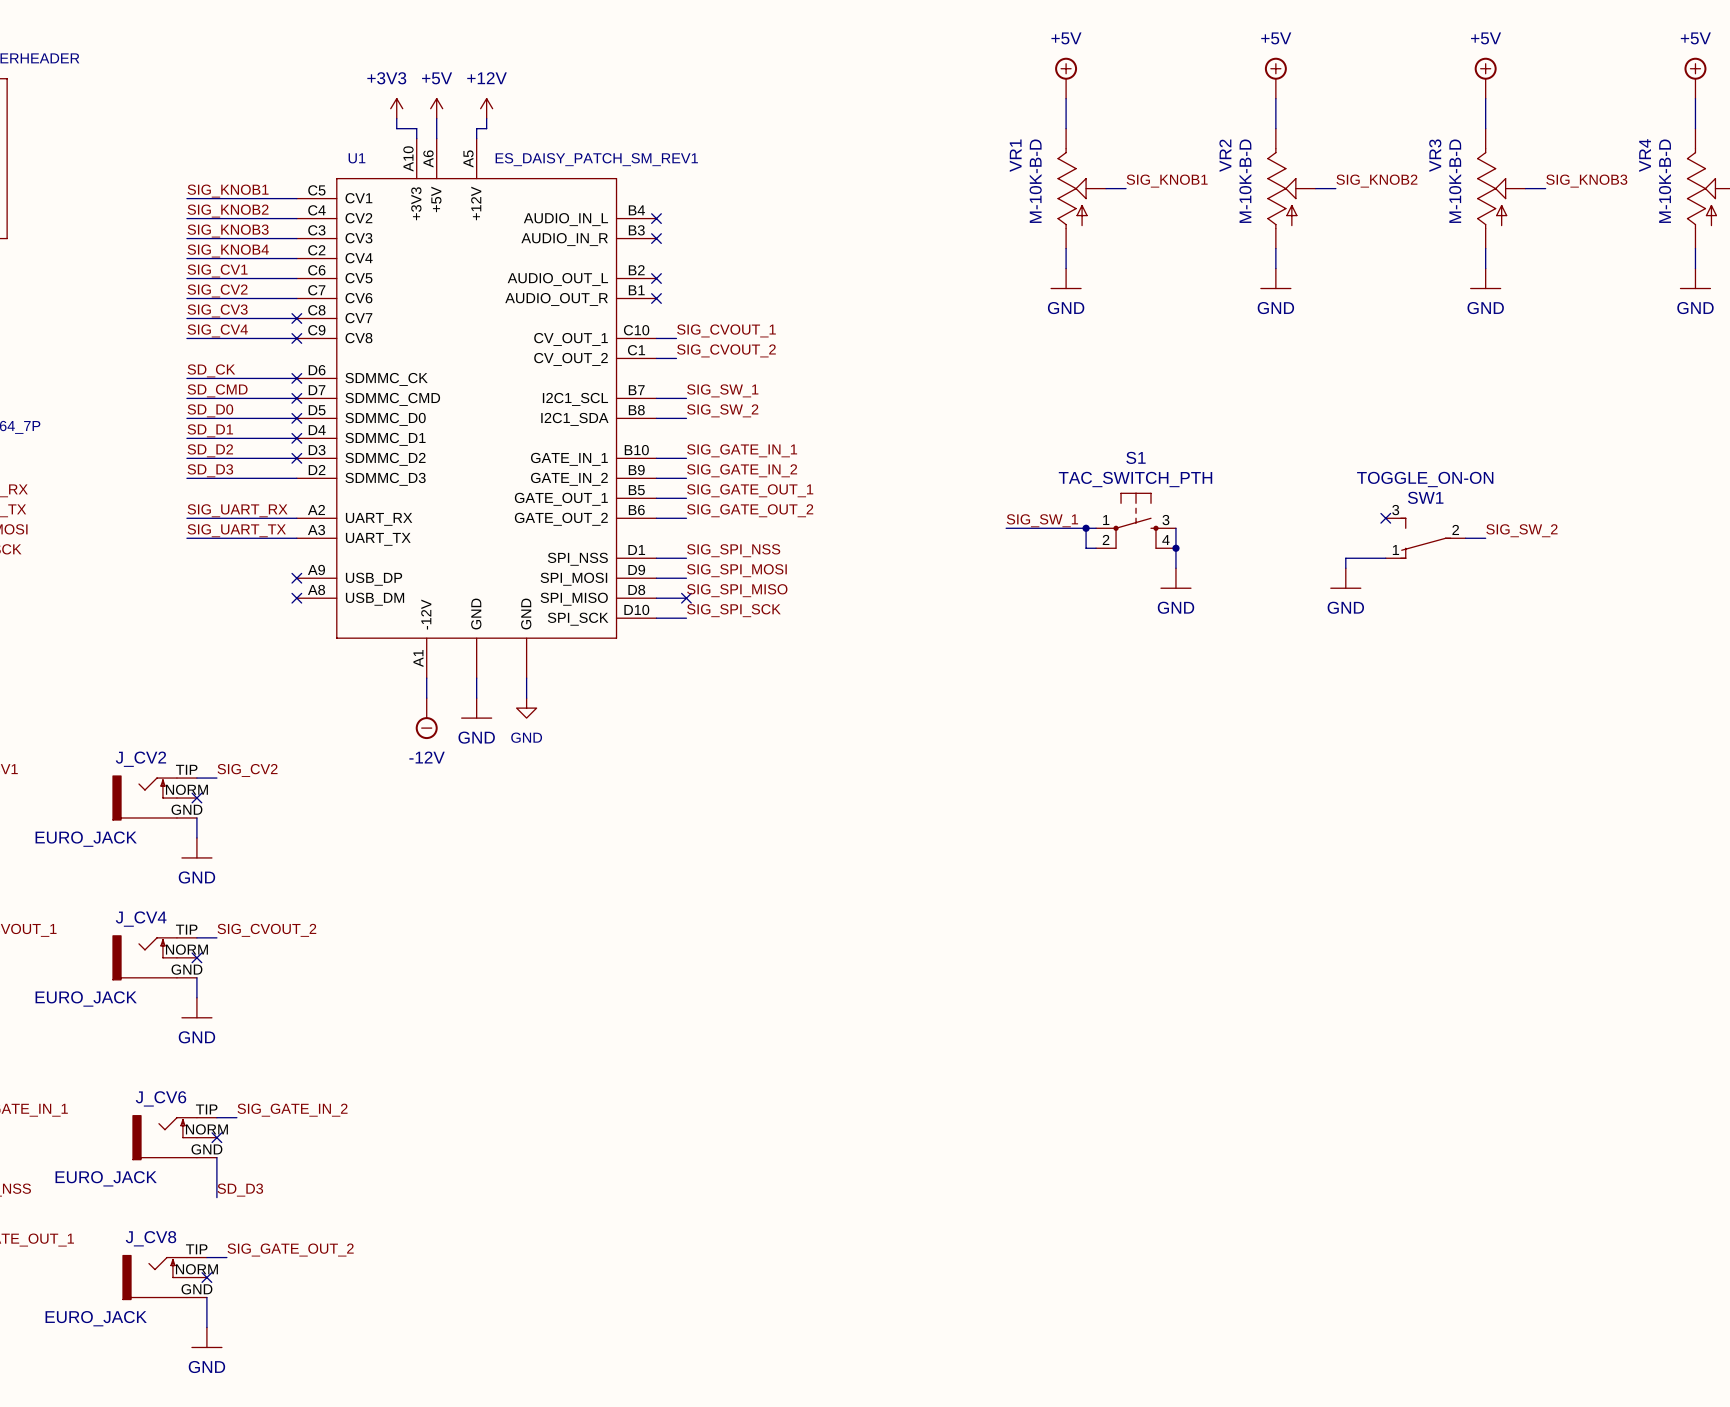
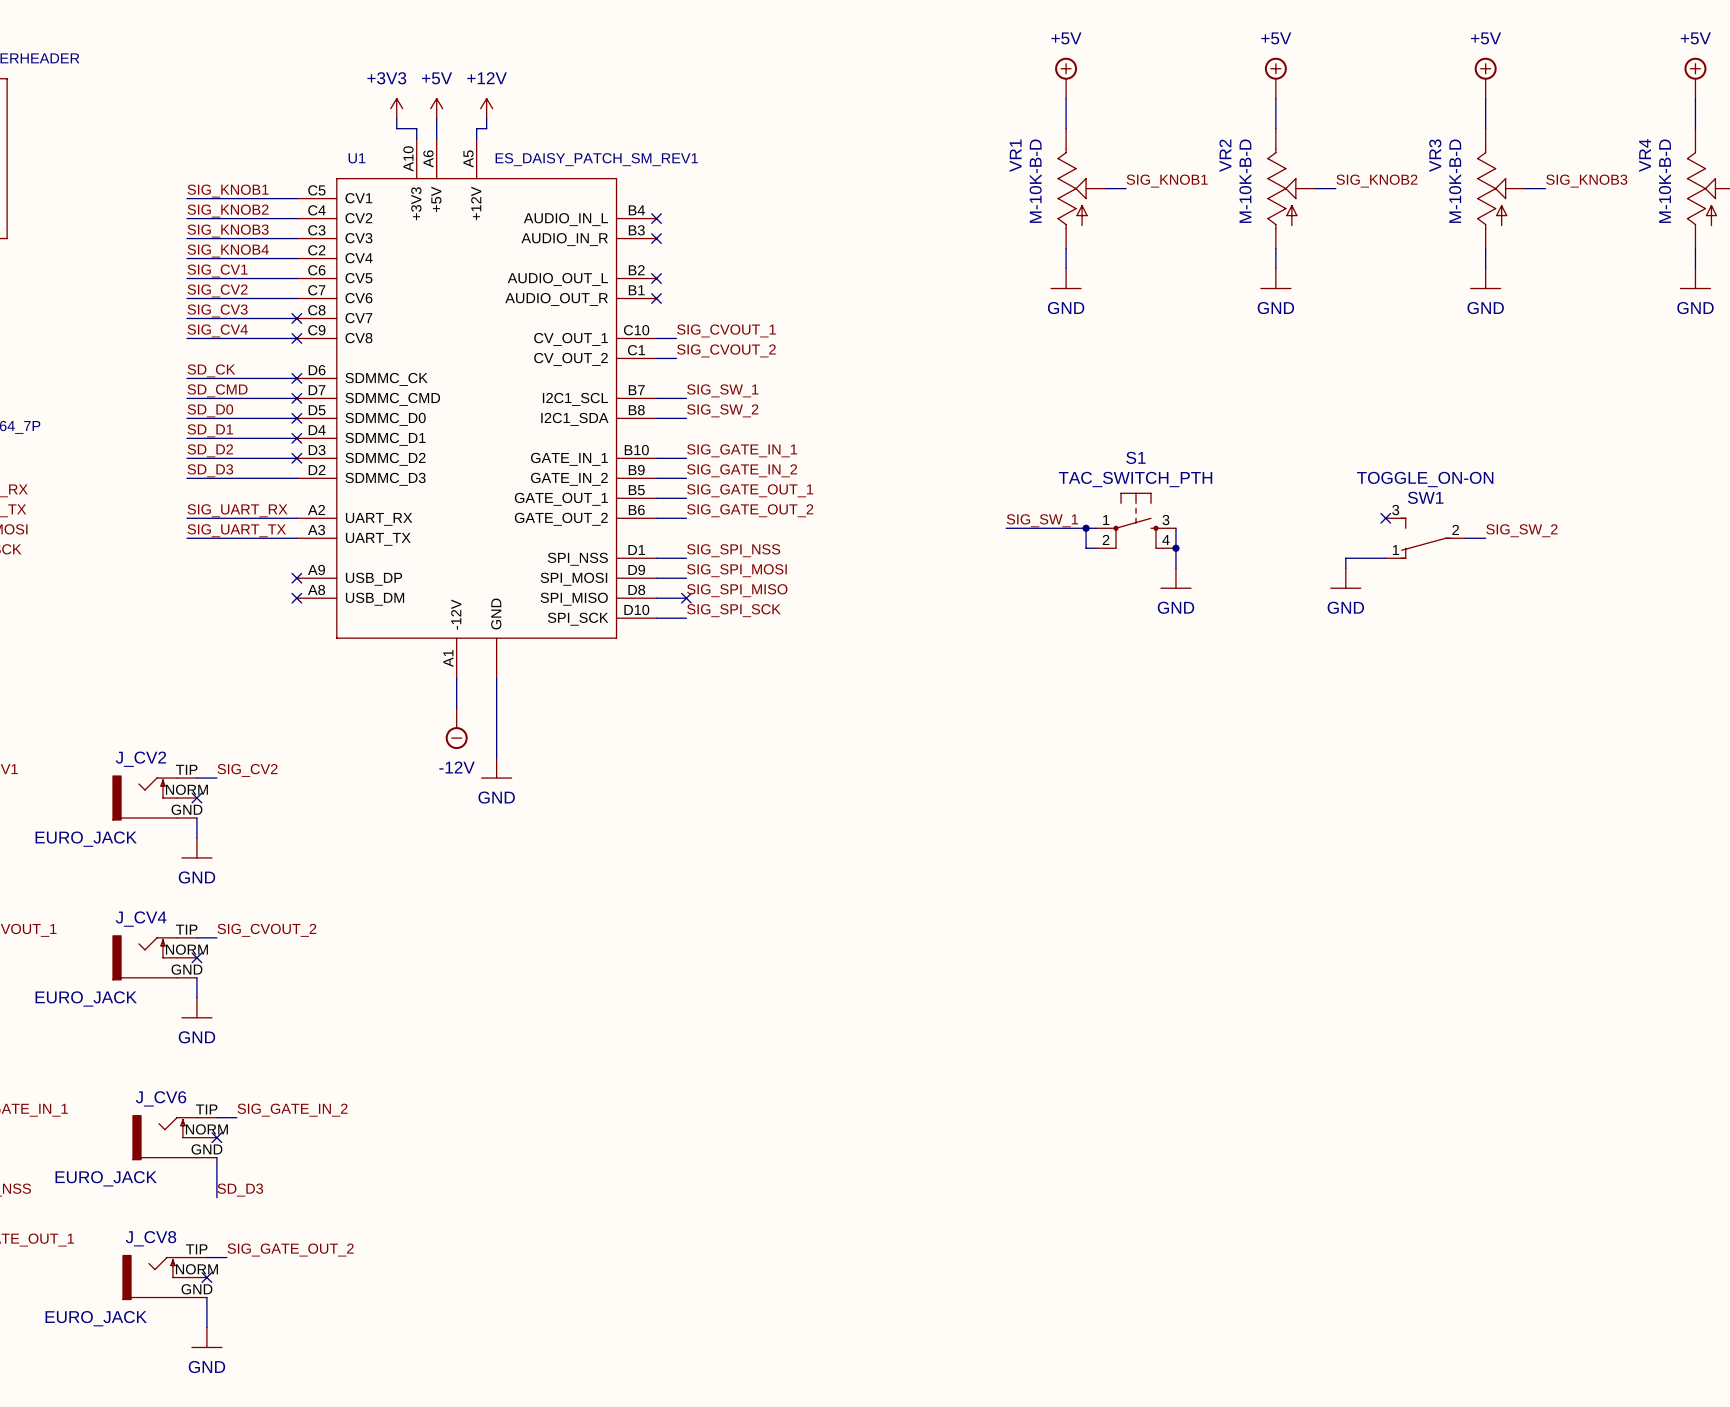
U1 symbol: [296, 138, 657, 679] -> [296, 138, 657, 679]
wire: (426, 678) (426, 698) -> none
wire: none -> (456, 678) (456, 708)
wire: (476, 678) (476, 698) -> none
wire: none -> (496, 678) (496, 758)
wire: (526, 678) (526, 698) -> none
power symbol position: GND (476, 708) -> GND (496, 768)
power symbol: GND (526, 708) -> none
power symbol position: -12V (426, 718) -> -12V (456, 728)

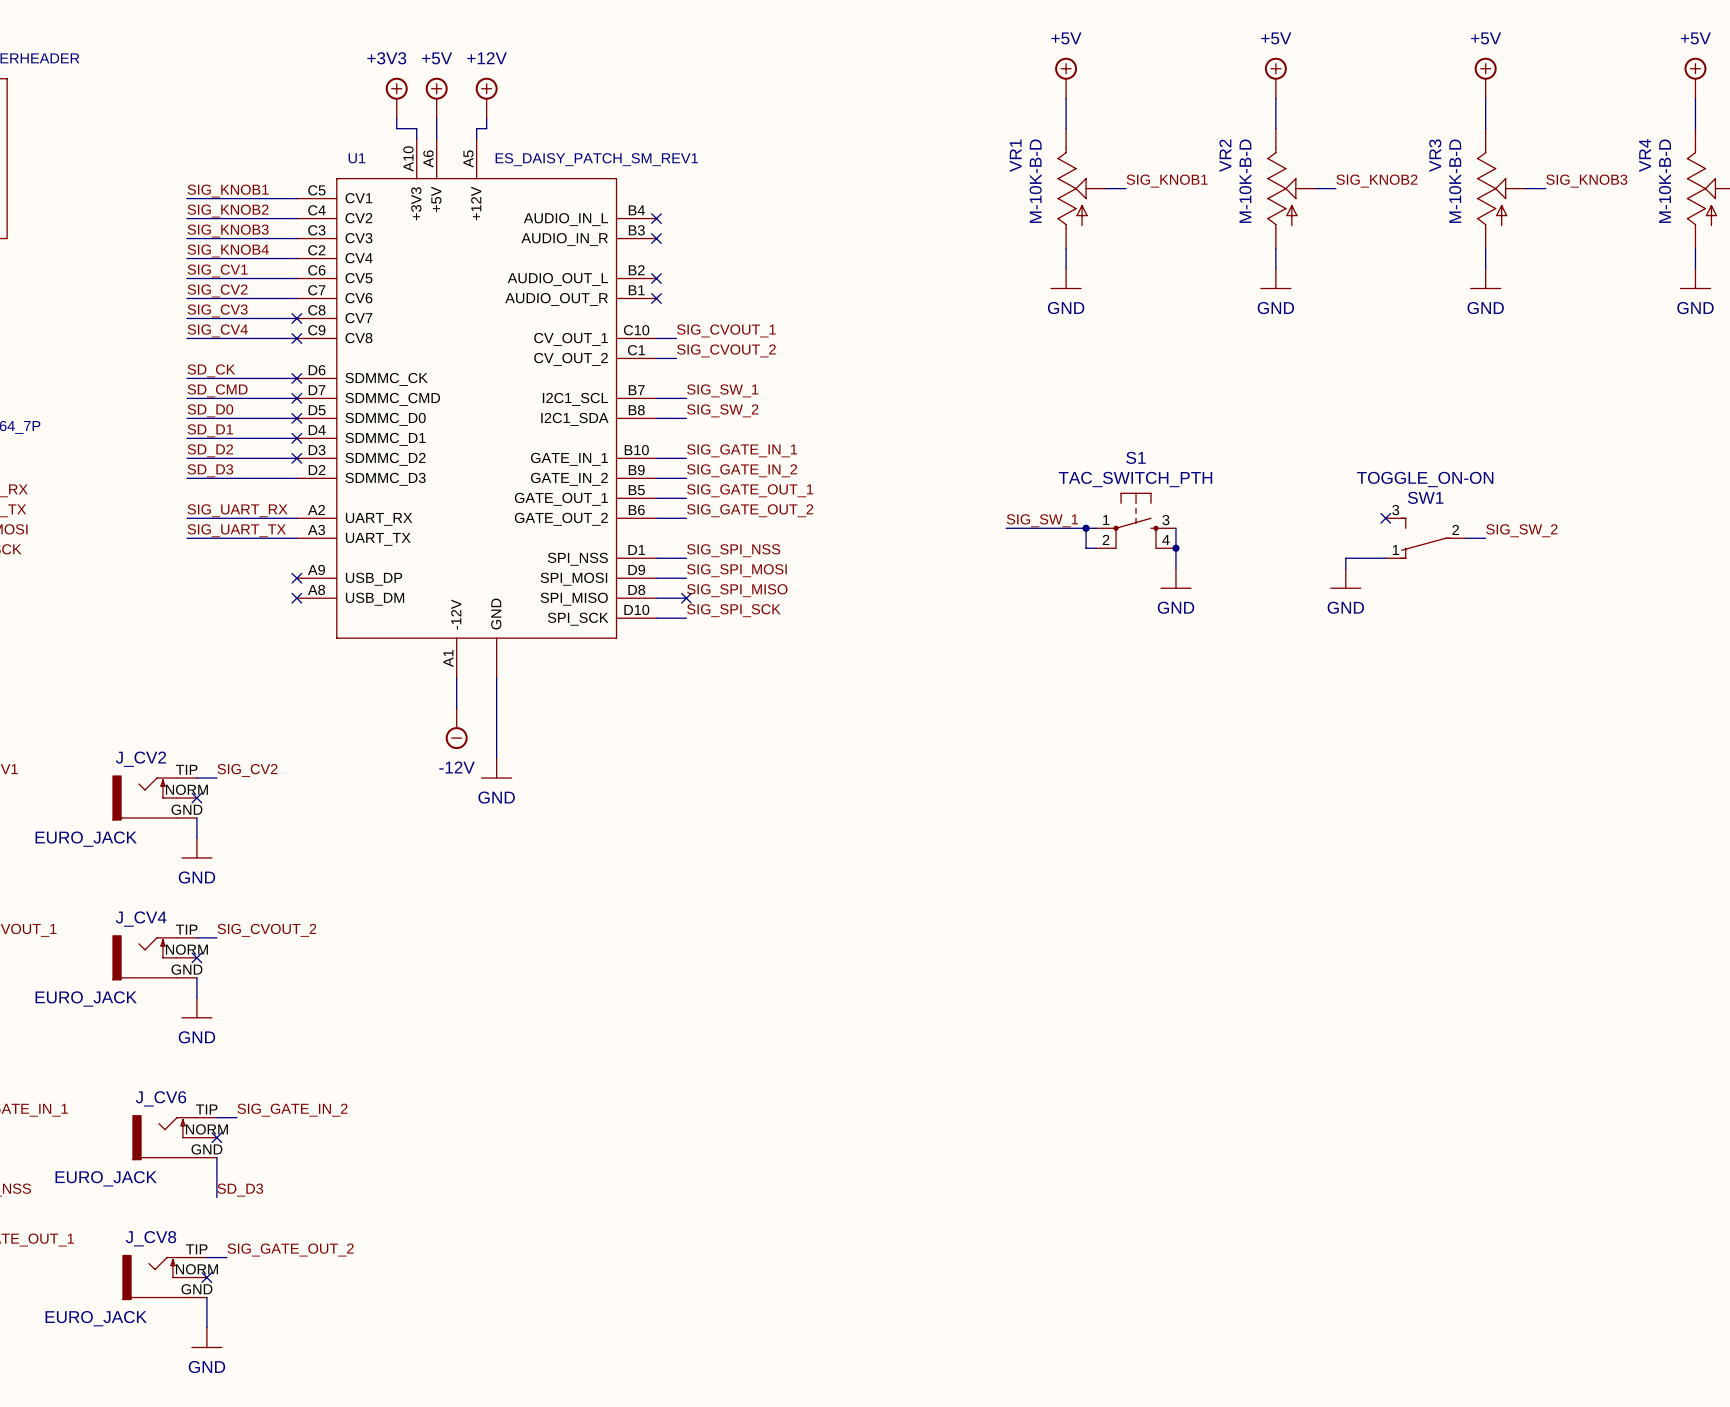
power symbol: none -> +3V3 (396, 98)
power symbol: none -> +5V (436, 98)
power symbol: none -> +12V (486, 98)
power symbol: +3V3 (396, 108) -> none
power symbol: +5V (436, 108) -> none
power symbol: +12V (486, 108) -> none

